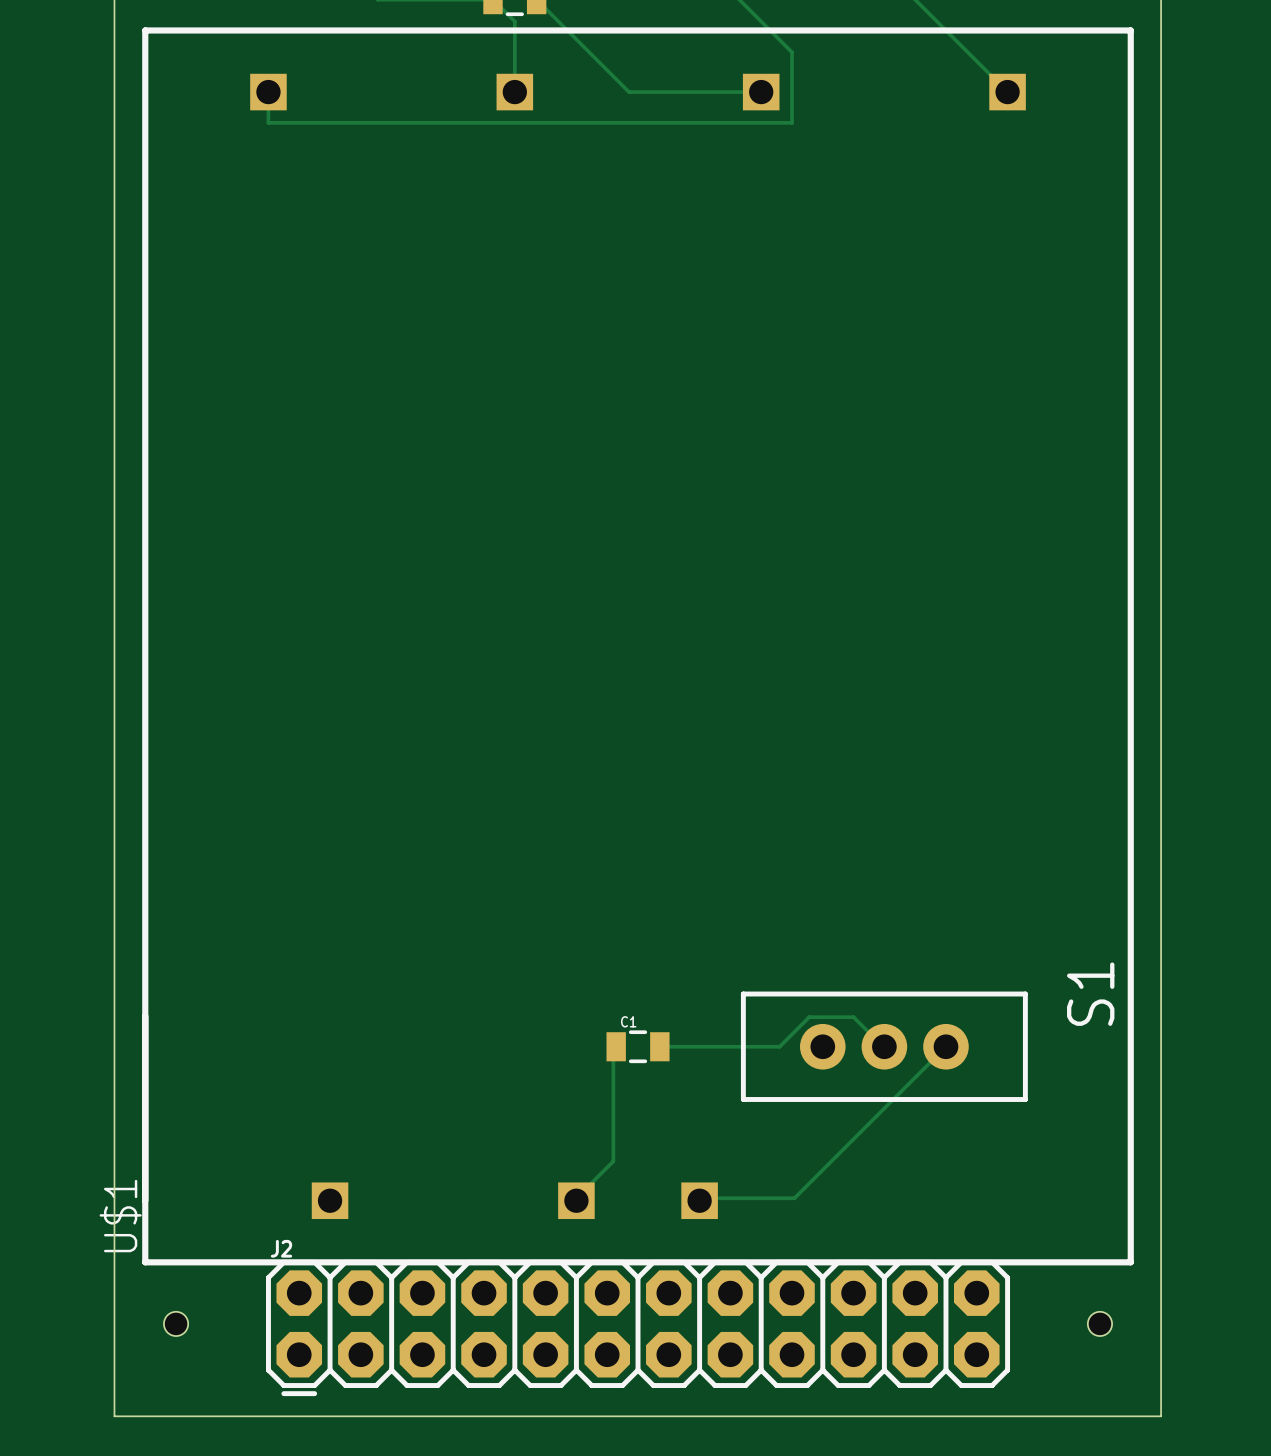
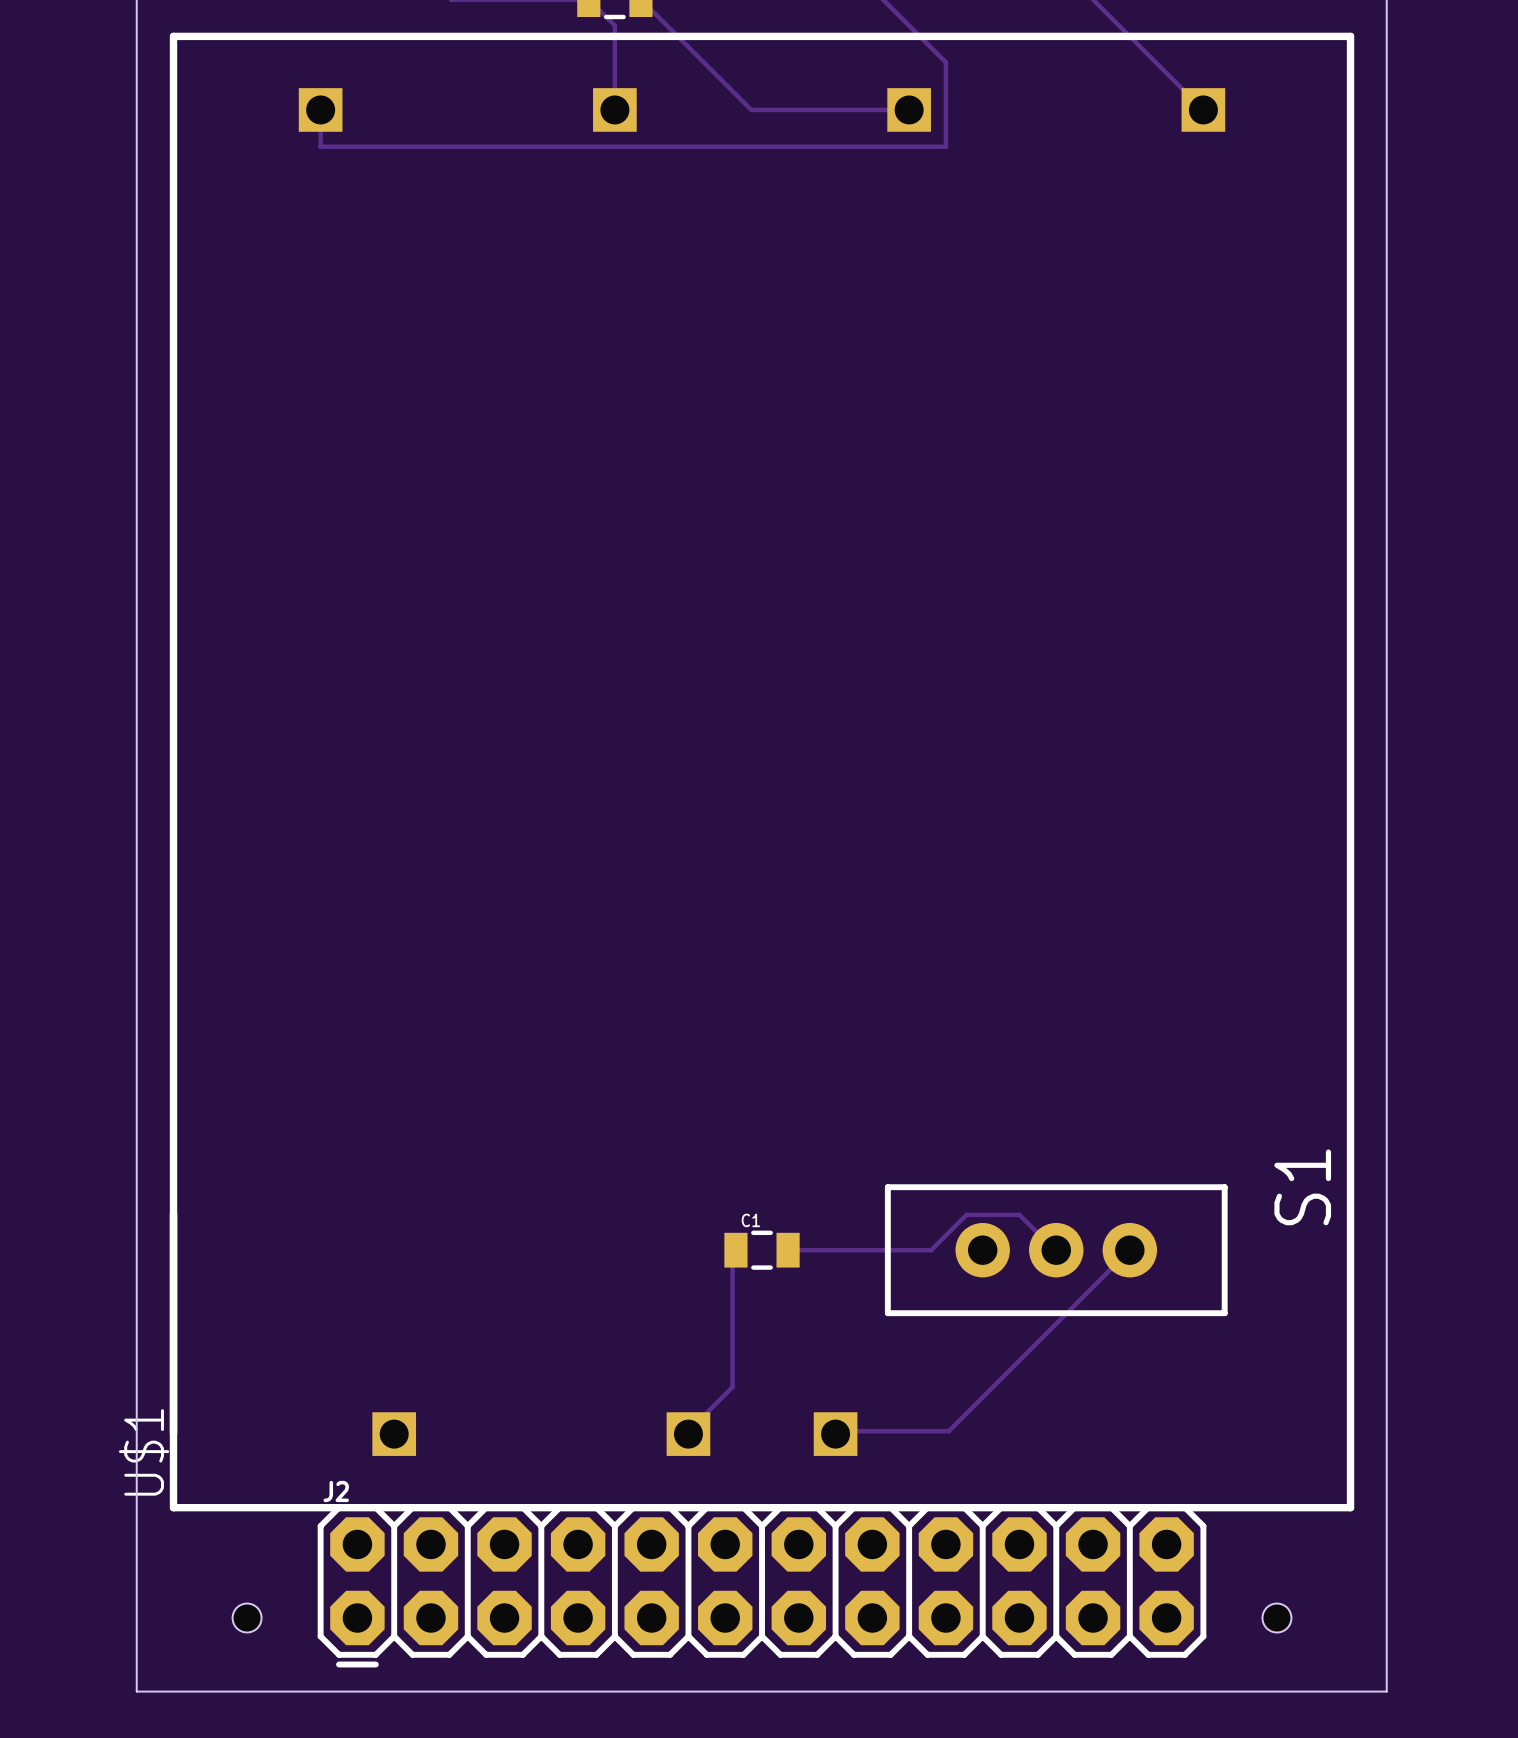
hole position: (176, 1323) -> (247, 1618)
hole position: (1099, 1323) -> (1276, 1618)

